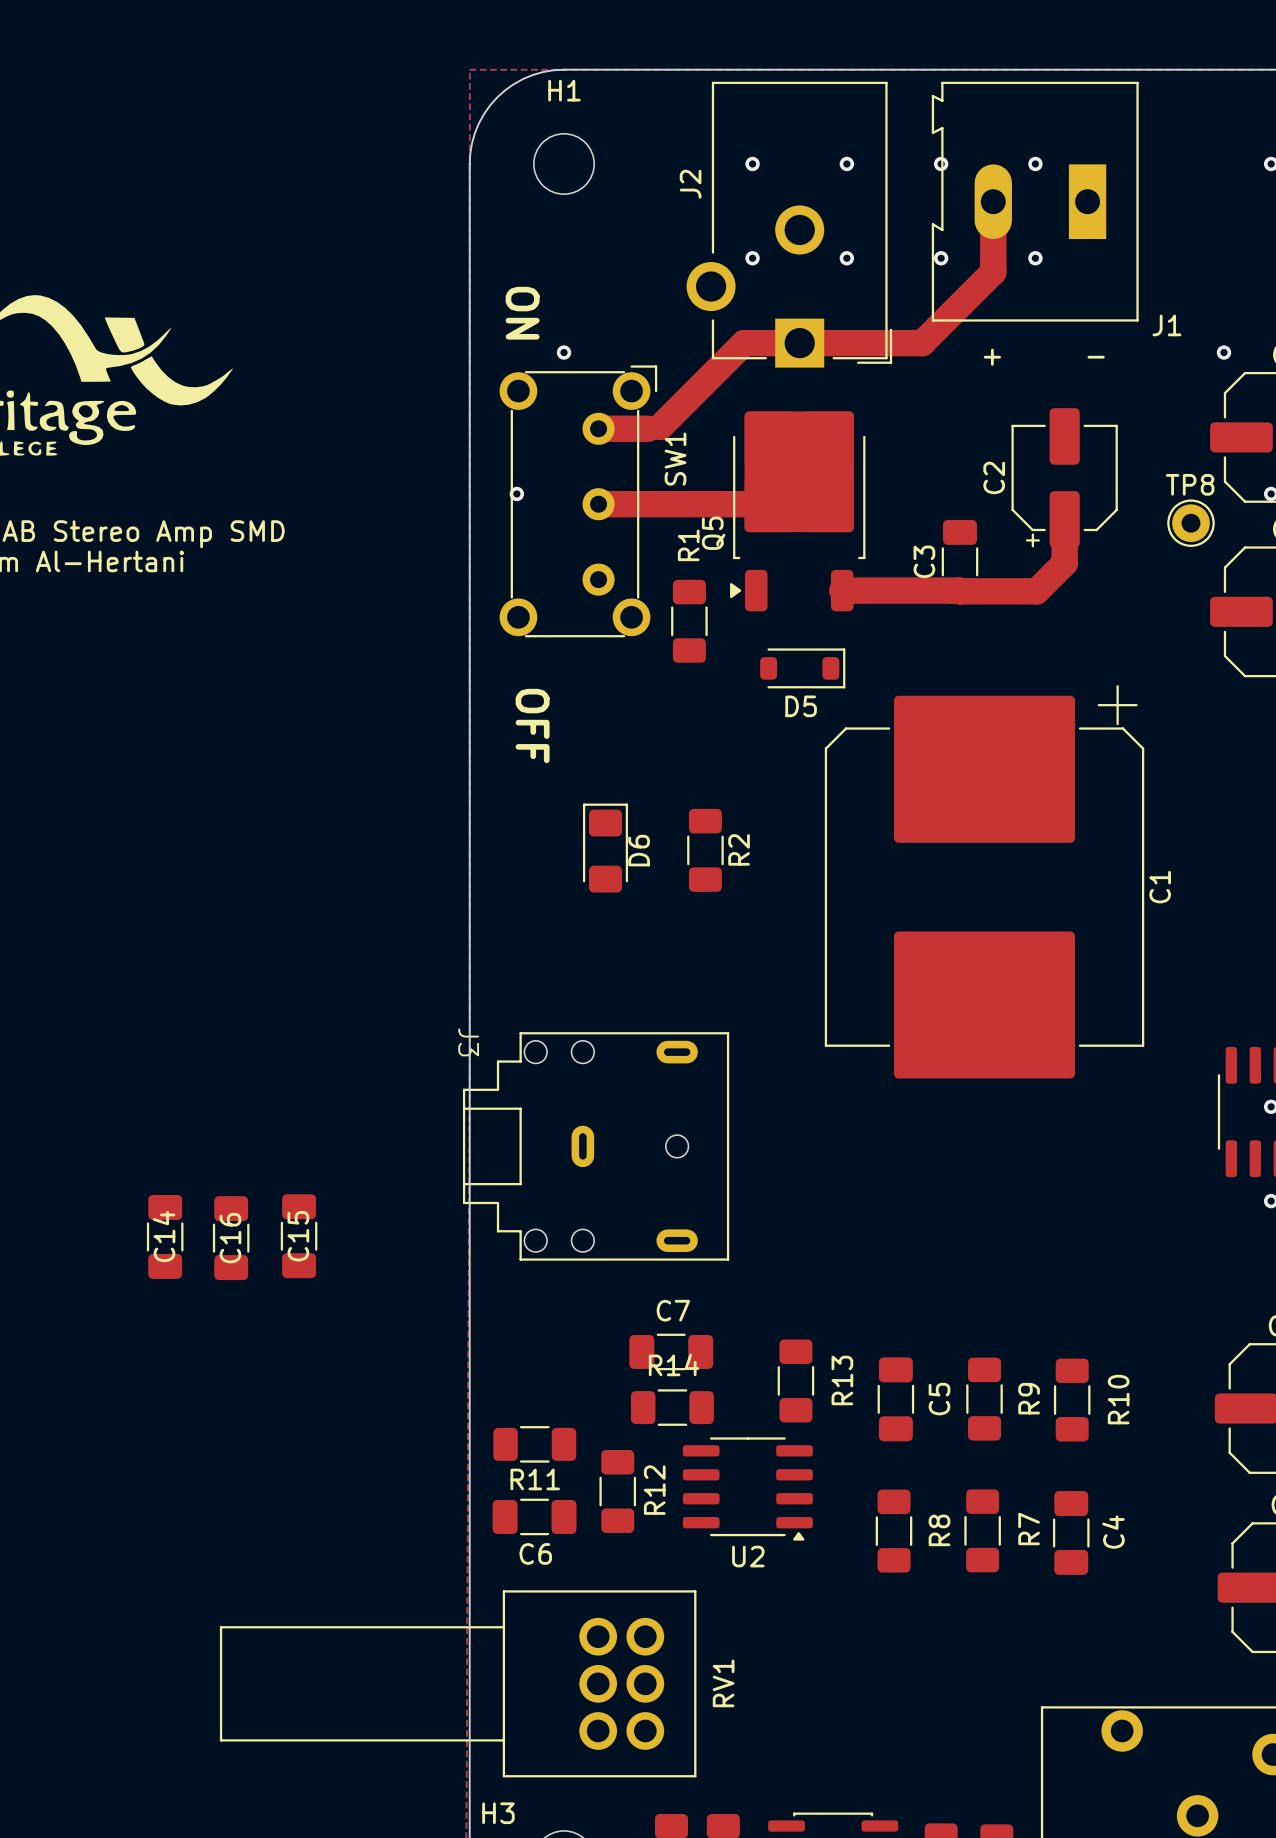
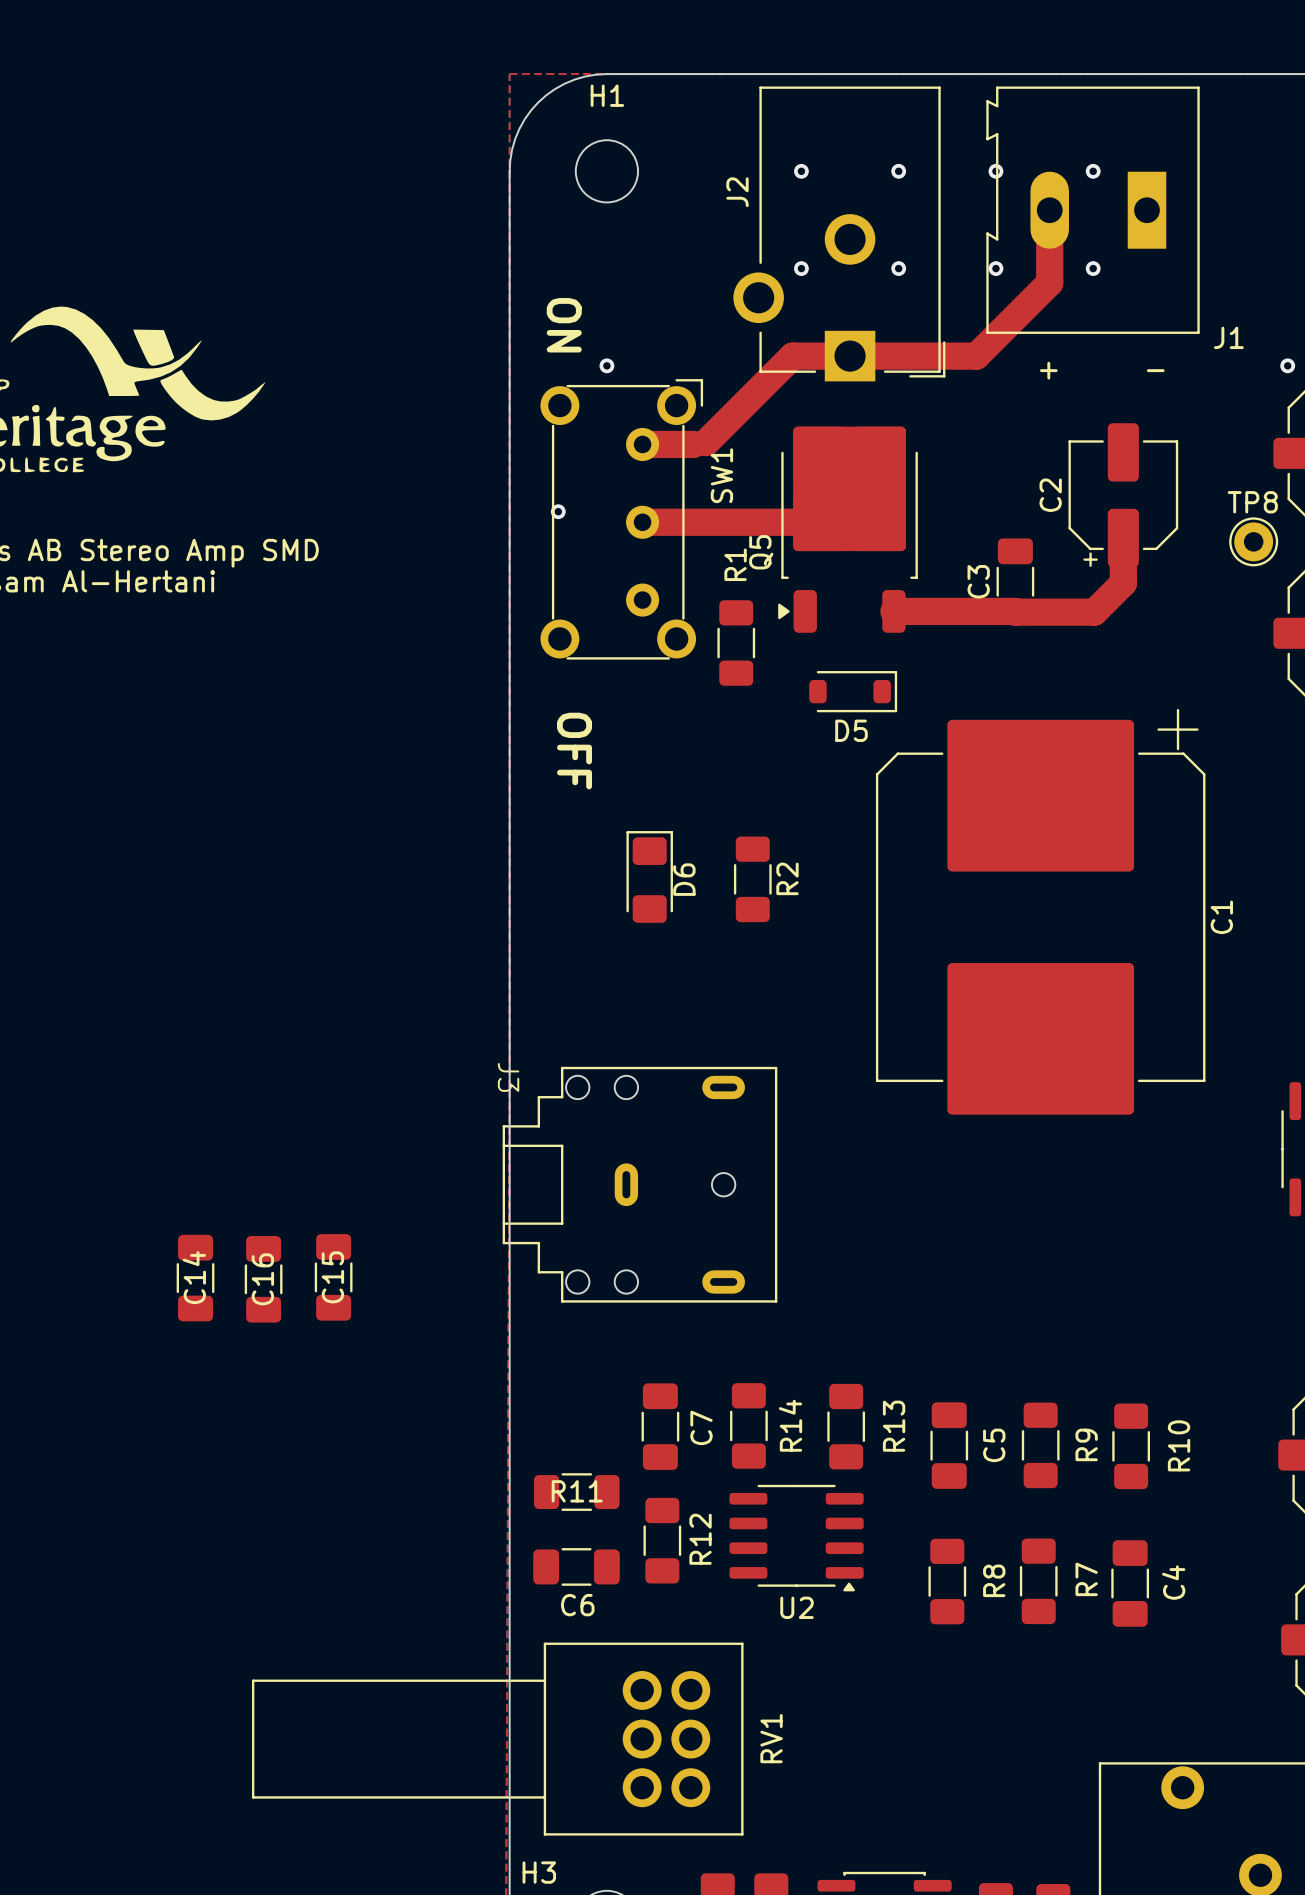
C7 rotation: 0° (671, 1351) -> 90° clockwise (660, 1426)
C7 position: (671, 1351) -> (660, 1426)
R14 rotation: 0° (672, 1407) -> 90° clockwise (748, 1425)
R11 name position: R11 (535, 1479) -> R11 (577, 1491)

